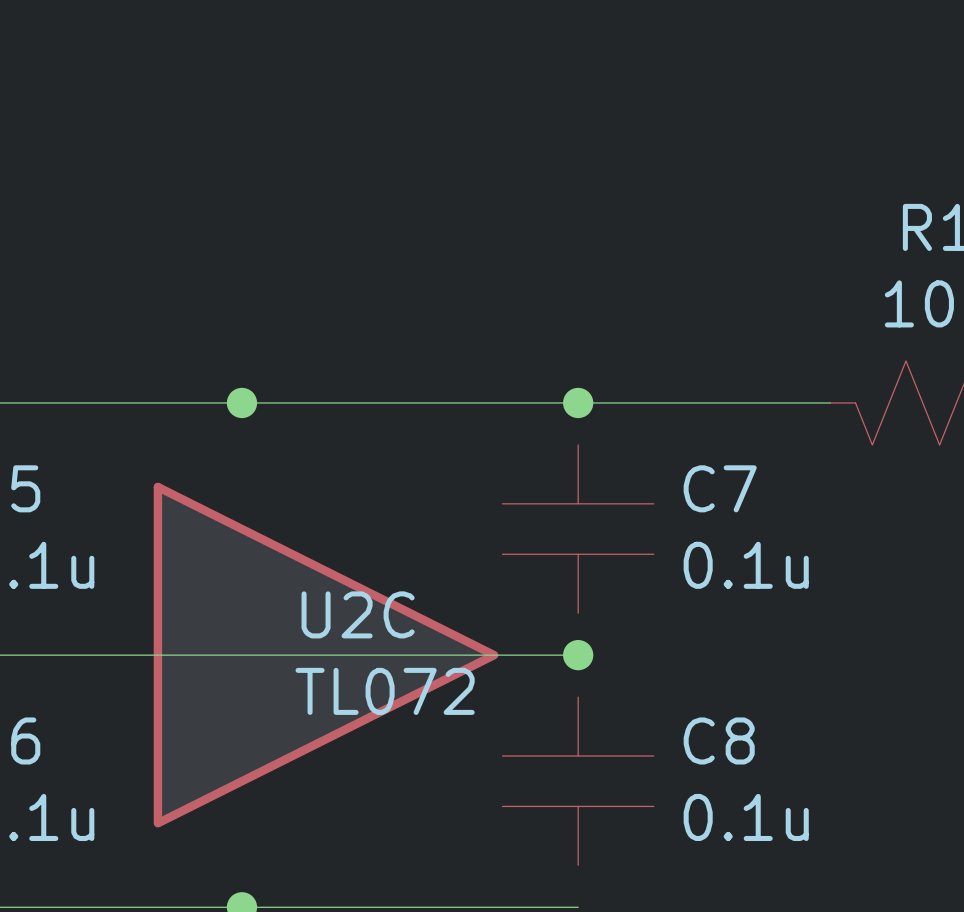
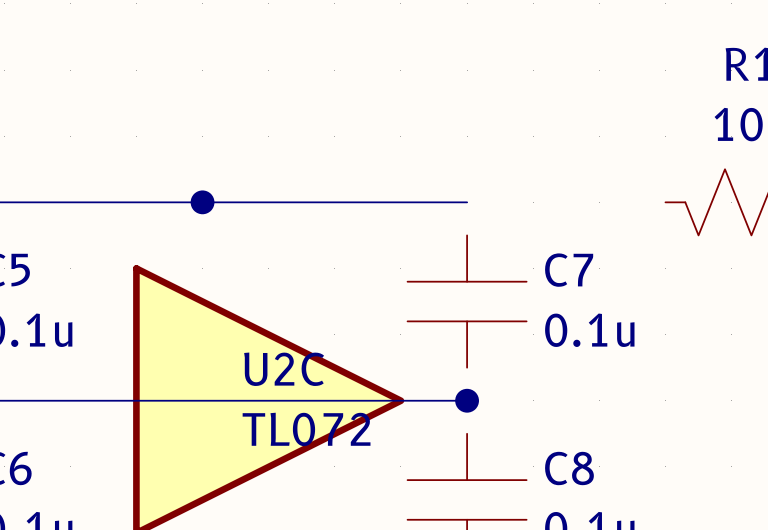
wire: (578, 402) (830, 402) -> none
junction: (578, 402) -> none

